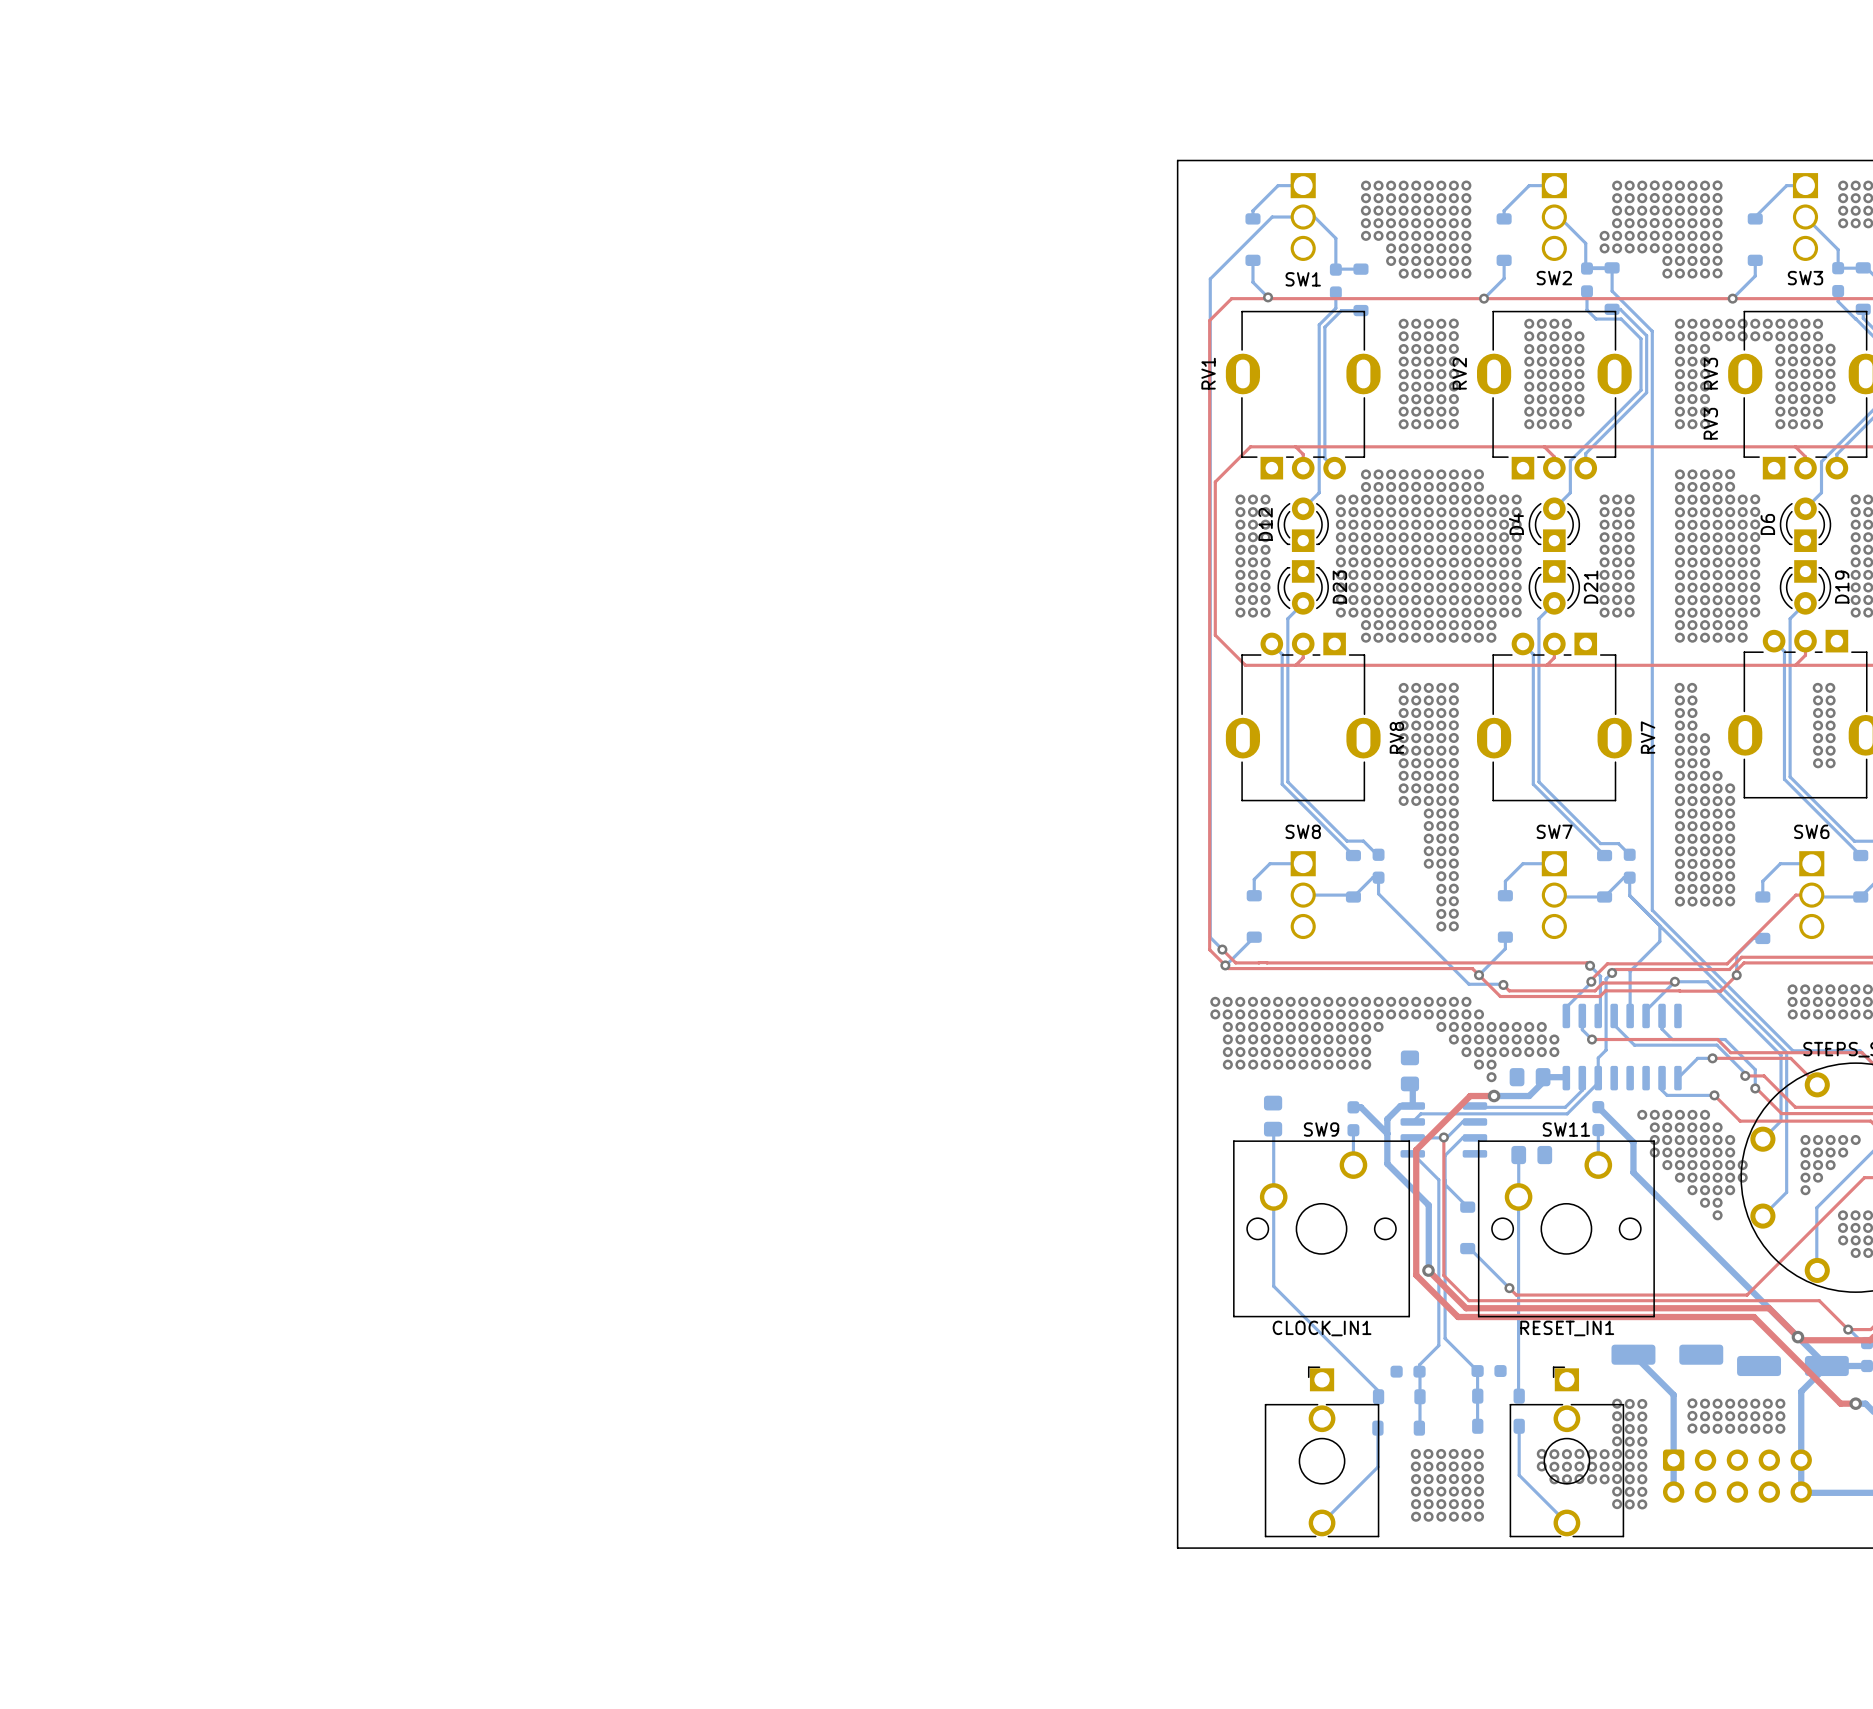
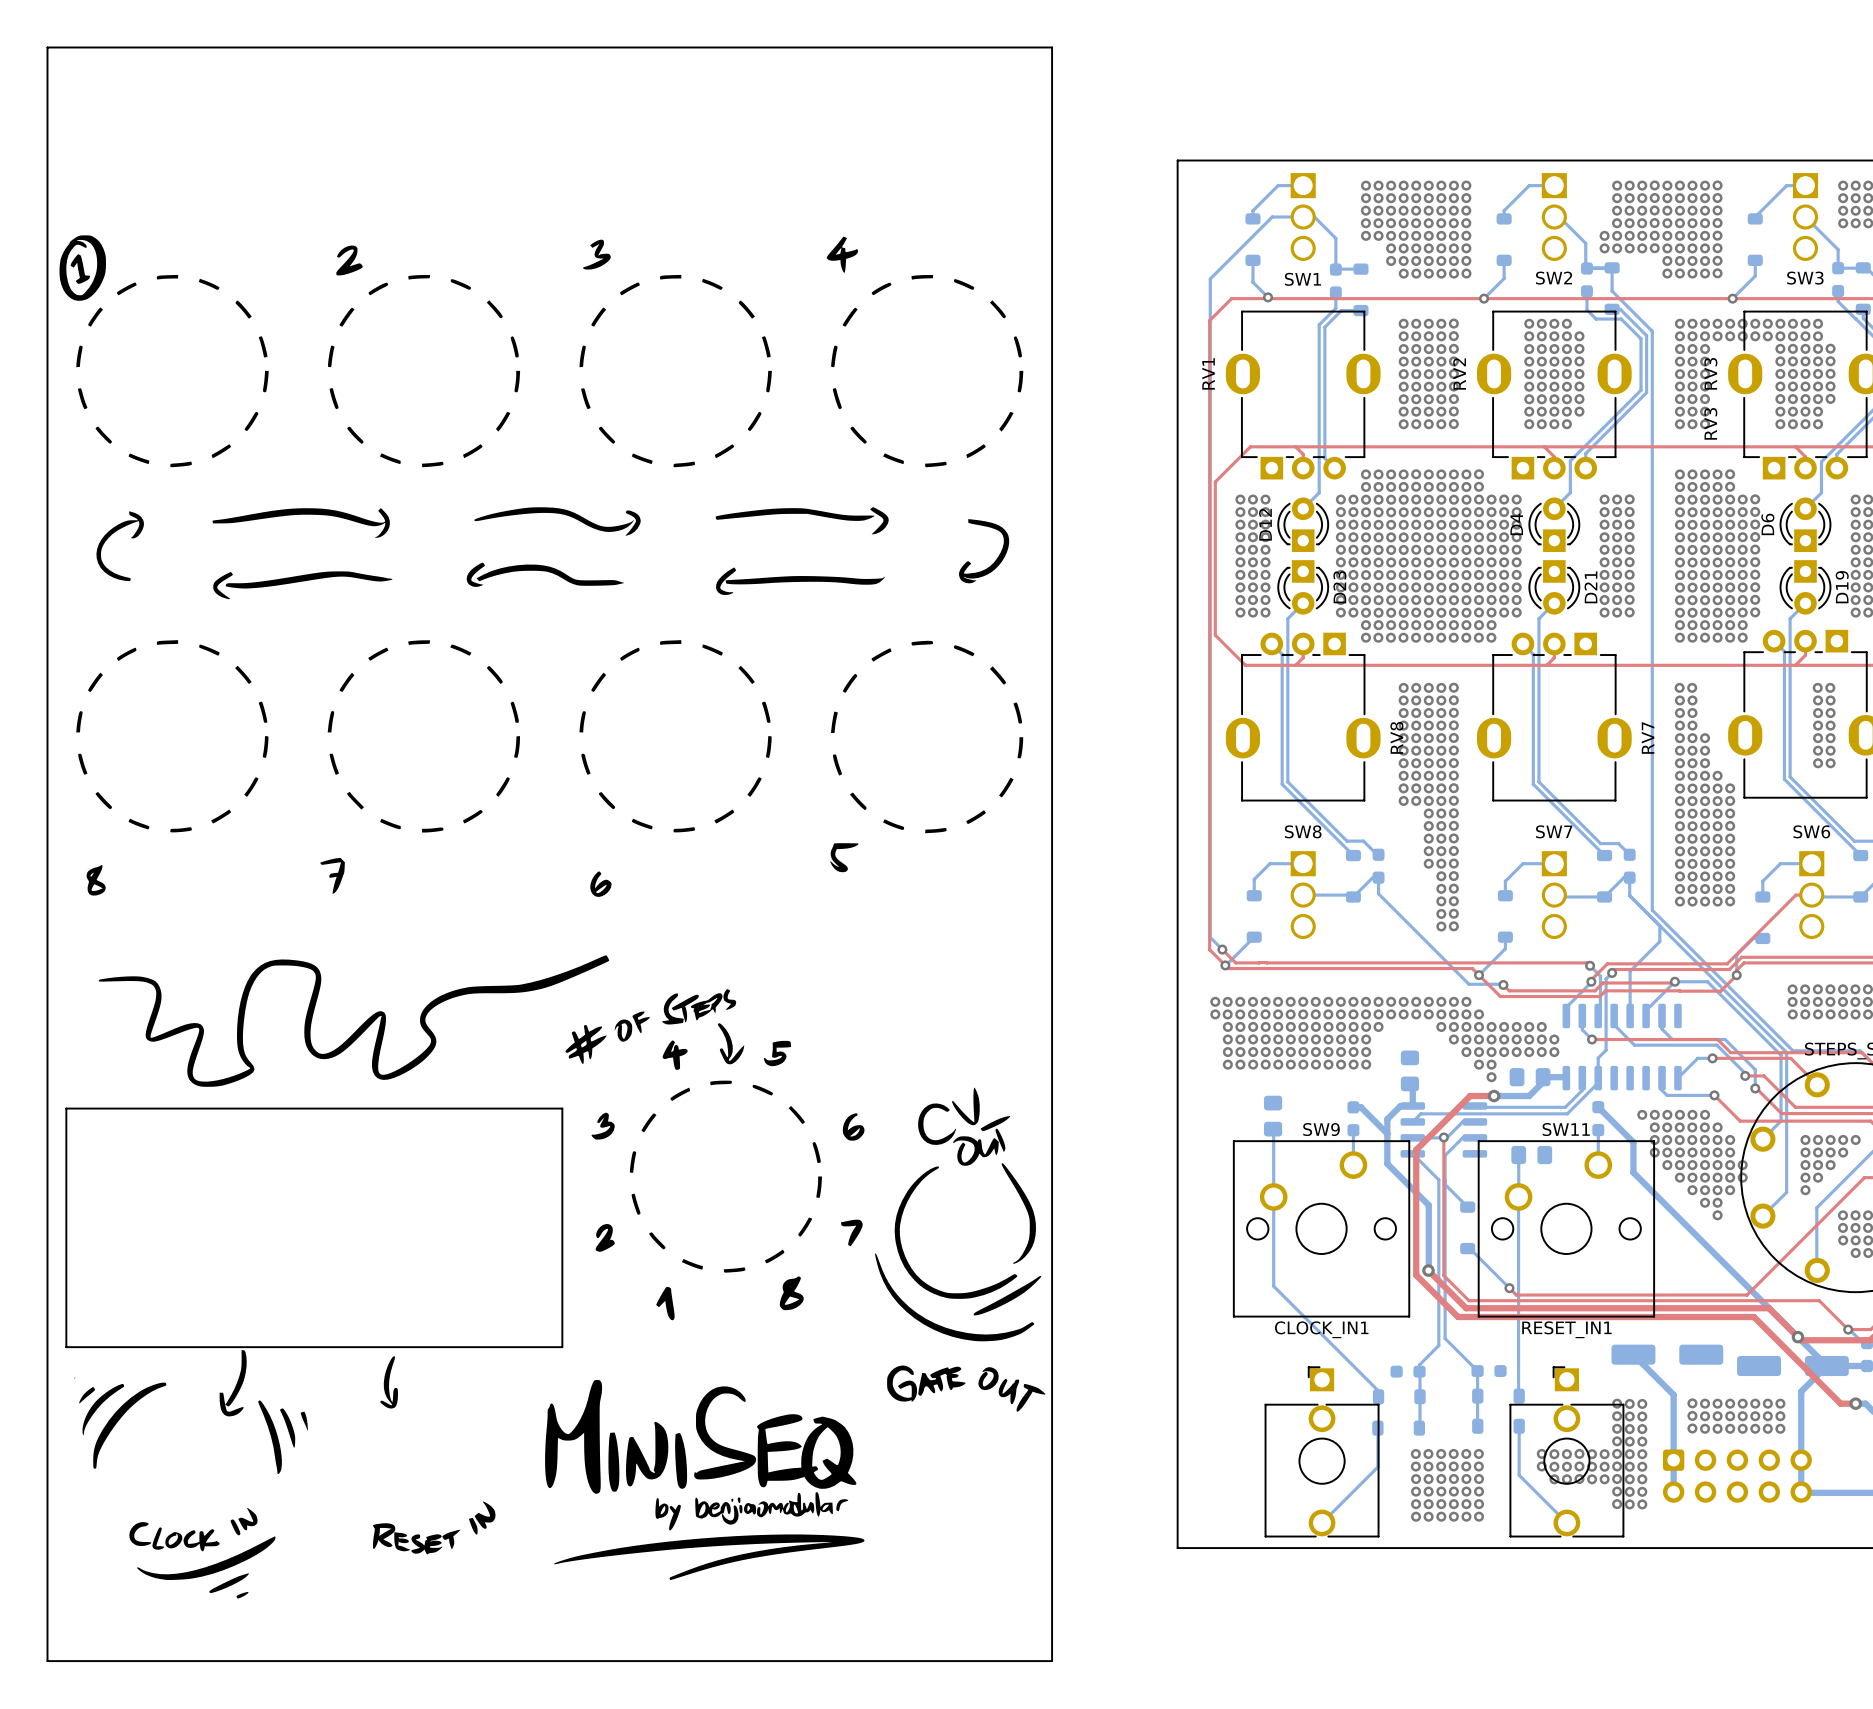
board edge: none -> (47, 47) (1052, 47) (1052, 1661) (47, 1661) (47, 47)
drawing: none -> [59, 235, 1046, 1599]
board edge: none -> (66, 1108) (562, 1108) (562, 1347) (66, 1347) (66, 1108)

